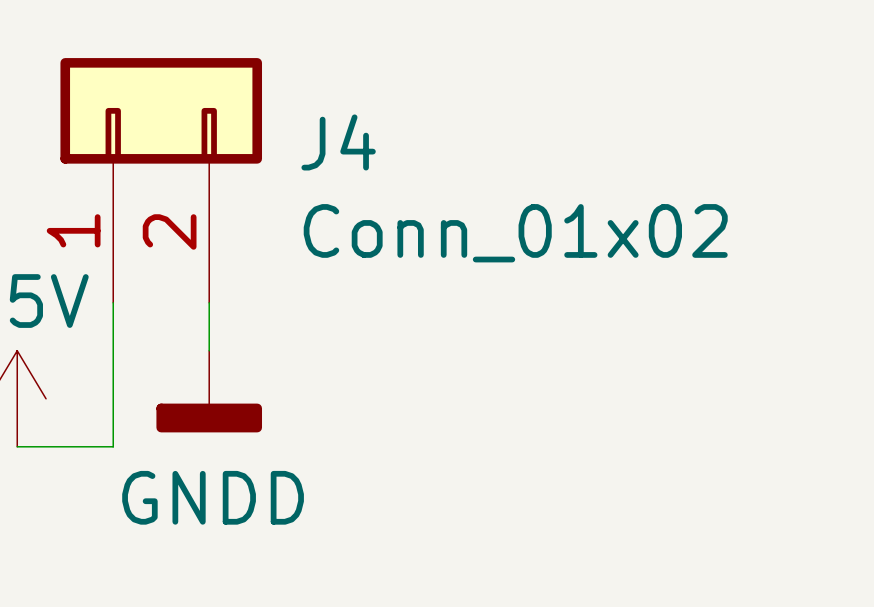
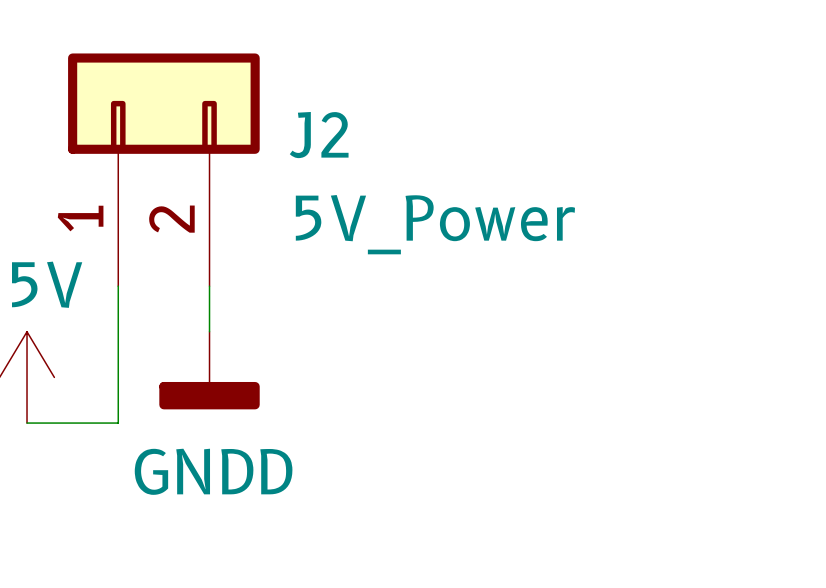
J4 name: J4 (338, 142) -> J2 (319, 135)
J4 value: Conn_01x02 (515, 233) -> 5V_Power (435, 224)

